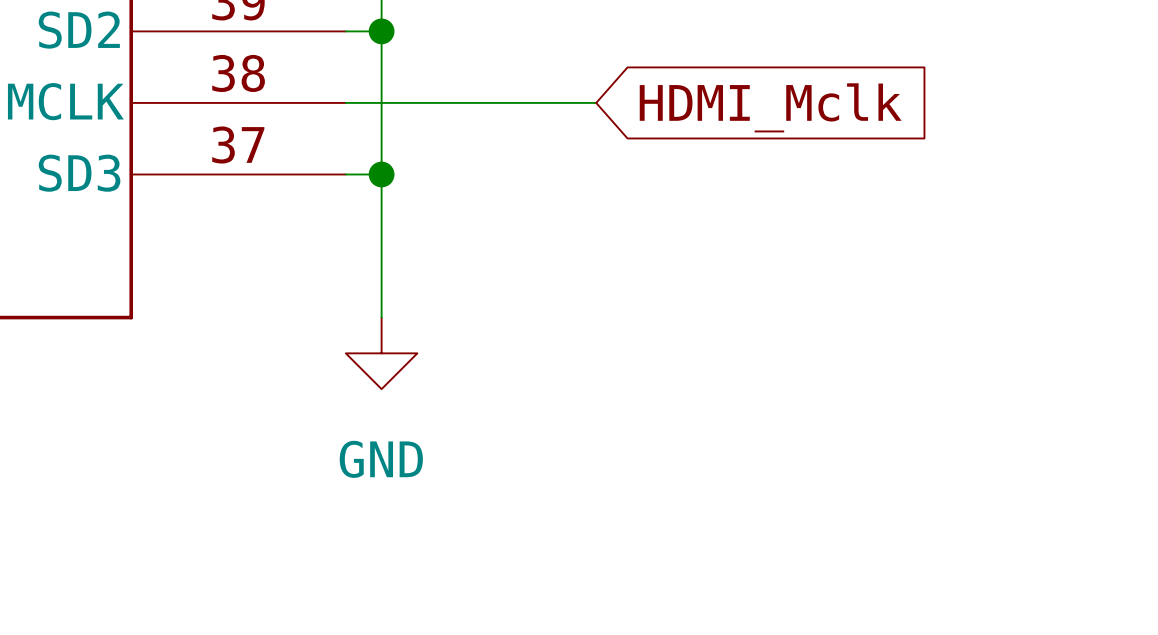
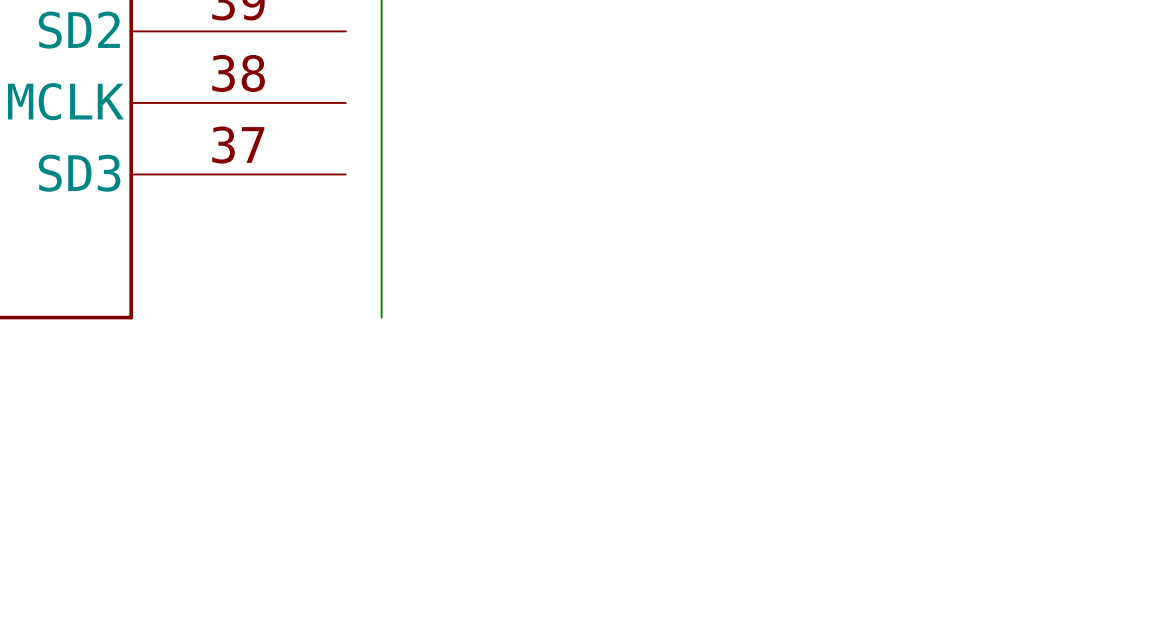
wire: (345, 31) (381, 31) -> none
junction: (381, 31) -> none
wire: (345, 102) (596, 102) -> none
global label: HDMI_Mclk (770, 107) -> none
wire: (345, 174) (381, 174) -> none
junction: (381, 174) -> none
power symbol: GND (381, 353) -> none

